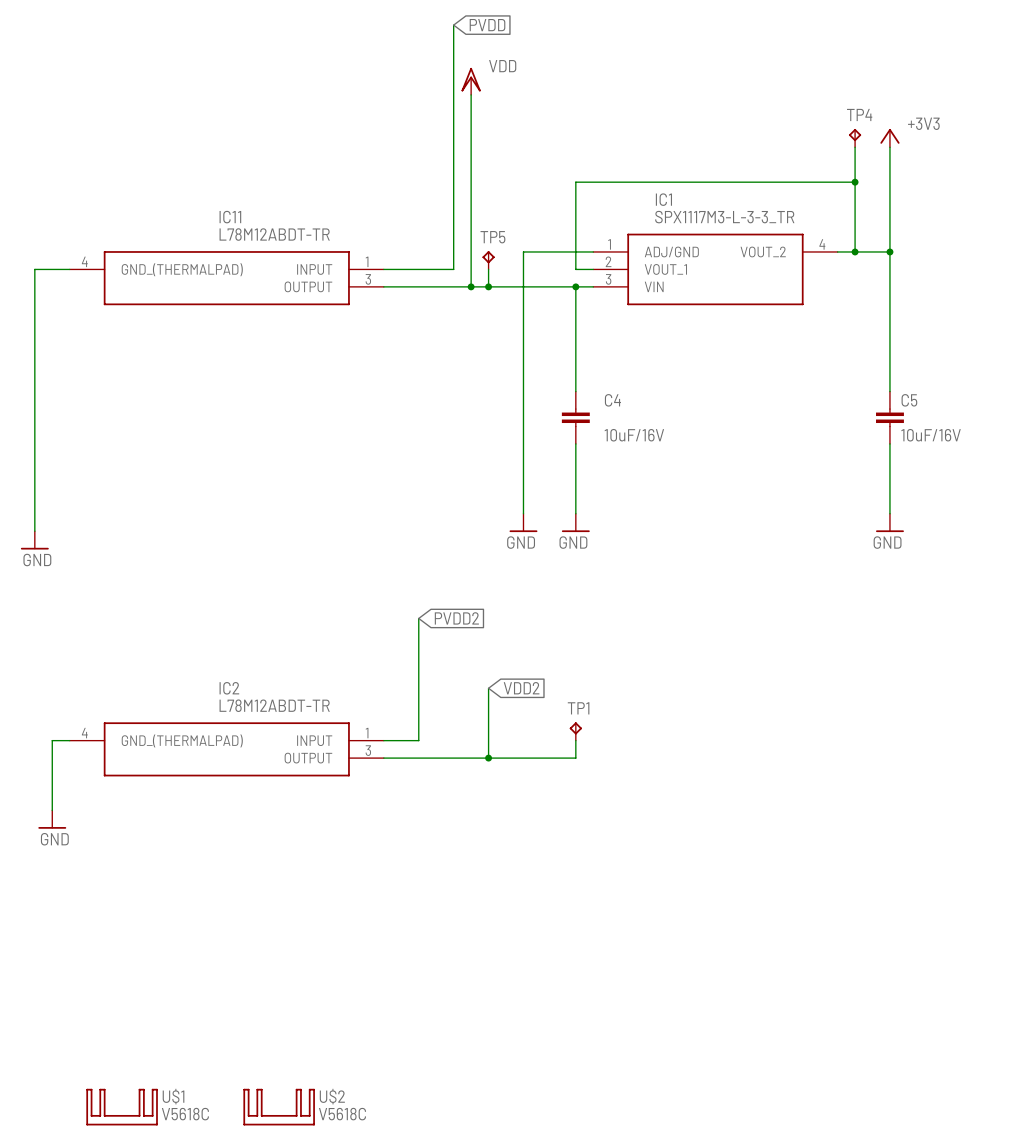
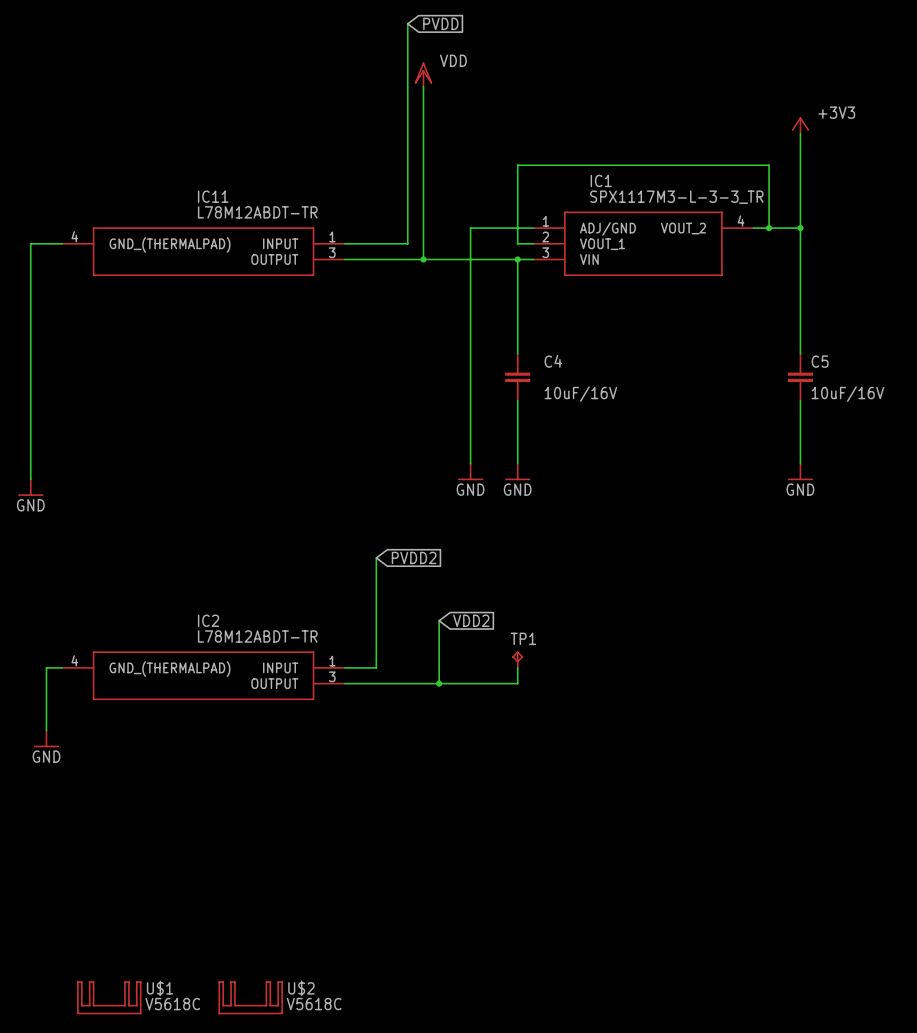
TP4: (855, 138) -> none
wire: (855, 147) (855, 182) -> none
junction: (855, 182) -> none
TP5: (488, 260) -> none
wire: (488, 269) (488, 286) -> none
junction: (488, 286) -> none

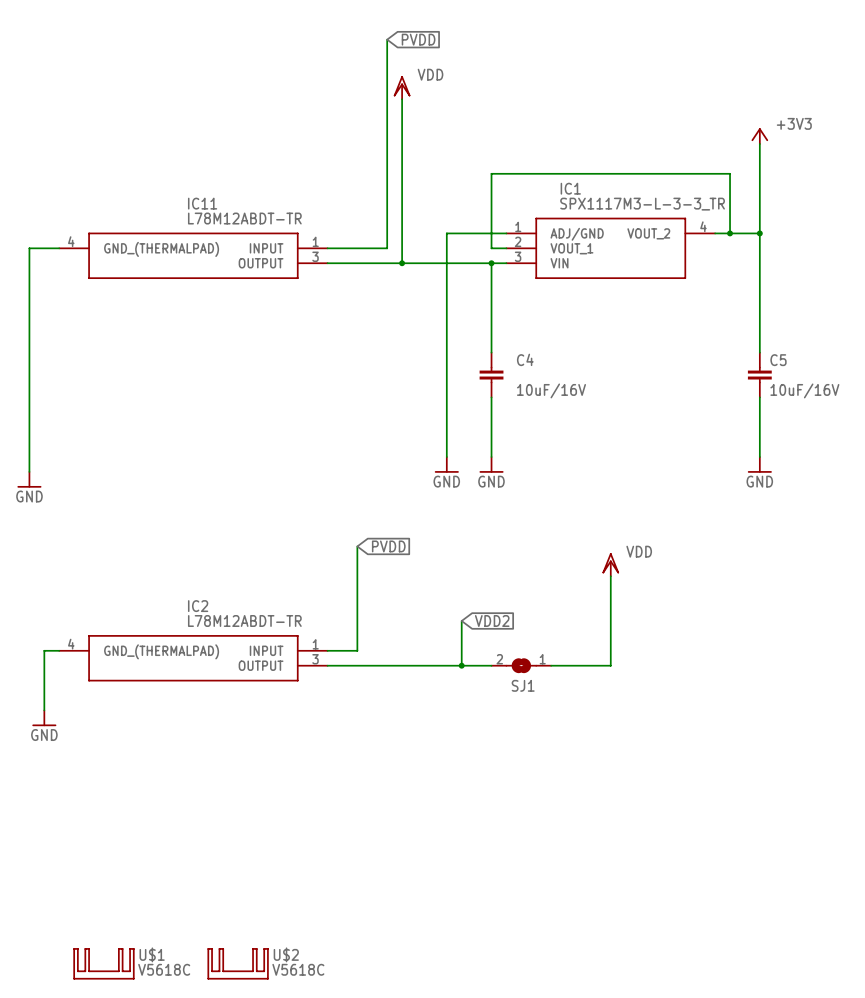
global label: PVDD2 (414, 557) -> PVDD (388, 546)
power symbol: none -> VDD (610, 564)
wire: none -> (610, 576) (610, 665) (551, 665)
wire: (439, 620) (439, 683) -> none
global label position: VDD2 (471, 620) -> VDD2 (492, 620)
wire: none -> (461, 620) (461, 665)
TP1: (517, 659) -> none
wire: (517, 667) (517, 683) -> none
junction: (439, 683) -> none
junction: none -> (461, 665)
SJ1: none -> (521, 665)

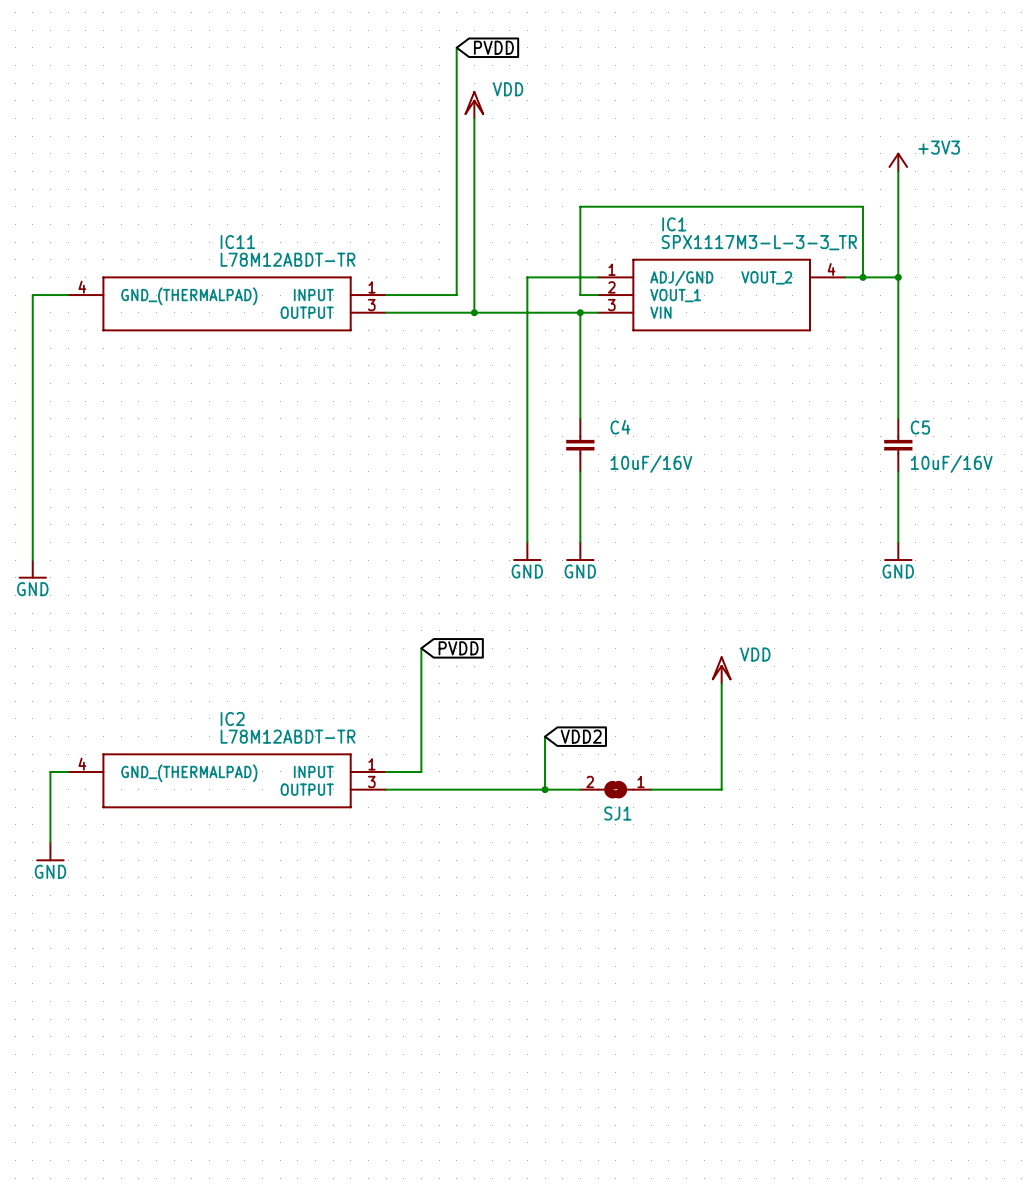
U$1: V5618C (103, 963) -> none
U$2: V5618C (238, 963) -> none

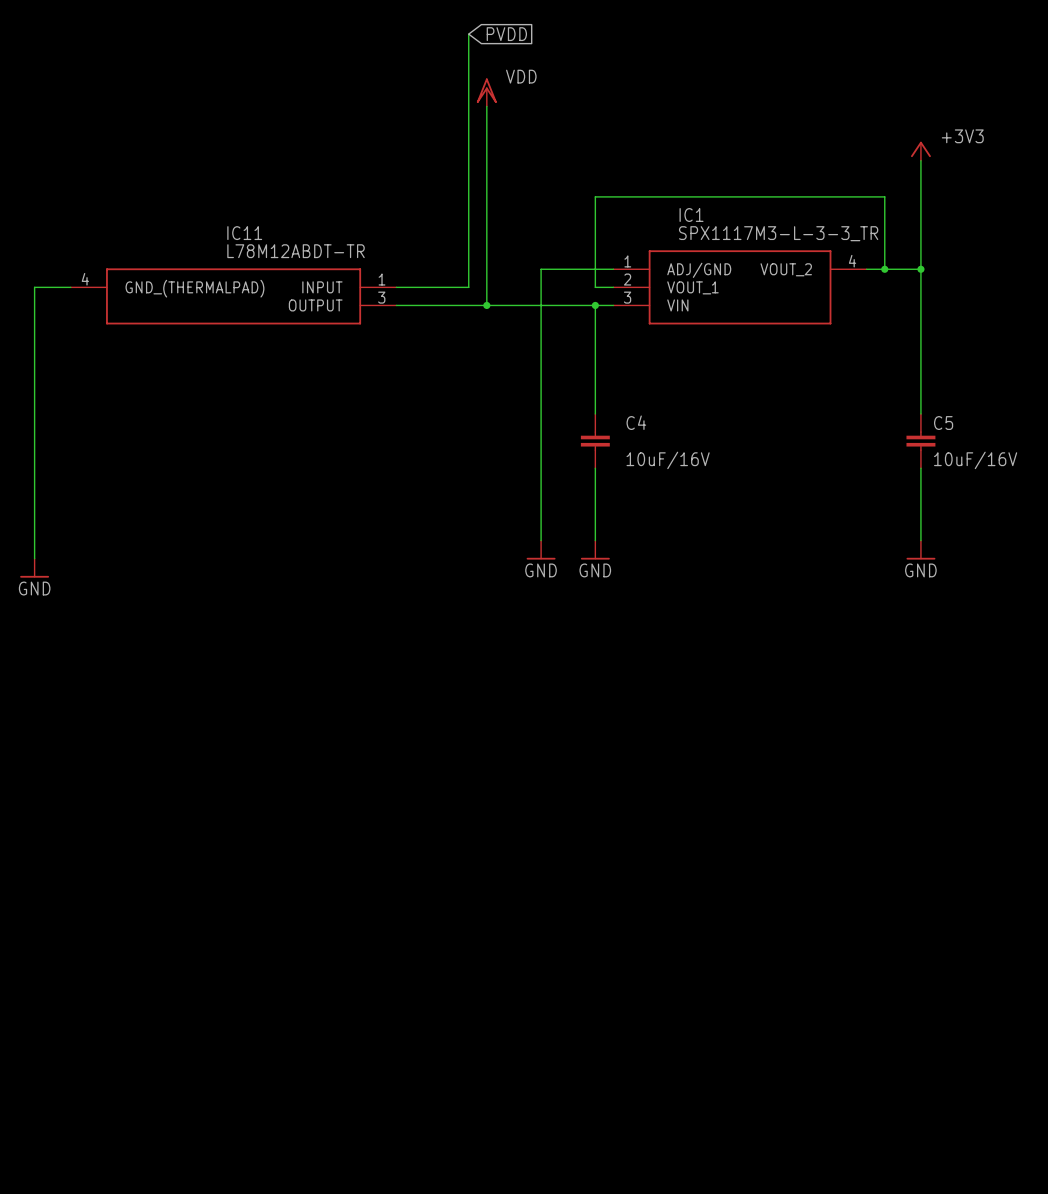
wire: (421, 648) (421, 771) (386, 771) -> none
global label: PVDD (458, 648) -> none
power symbol: VDD (721, 669) -> none
wire: (721, 683) (721, 789) (651, 789) -> none
wire: (545, 736) (545, 789) -> none
global label: VDD2 (581, 736) -> none
wire: (68, 771) (50, 771) (50, 842) -> none
IC2: L78M12ABDT-TR (227, 780) -> none
wire: (386, 789) (580, 789) -> none
junction: (545, 789) -> none
SJ1: (615, 789) -> none
power symbol: GND (50, 851) -> none

